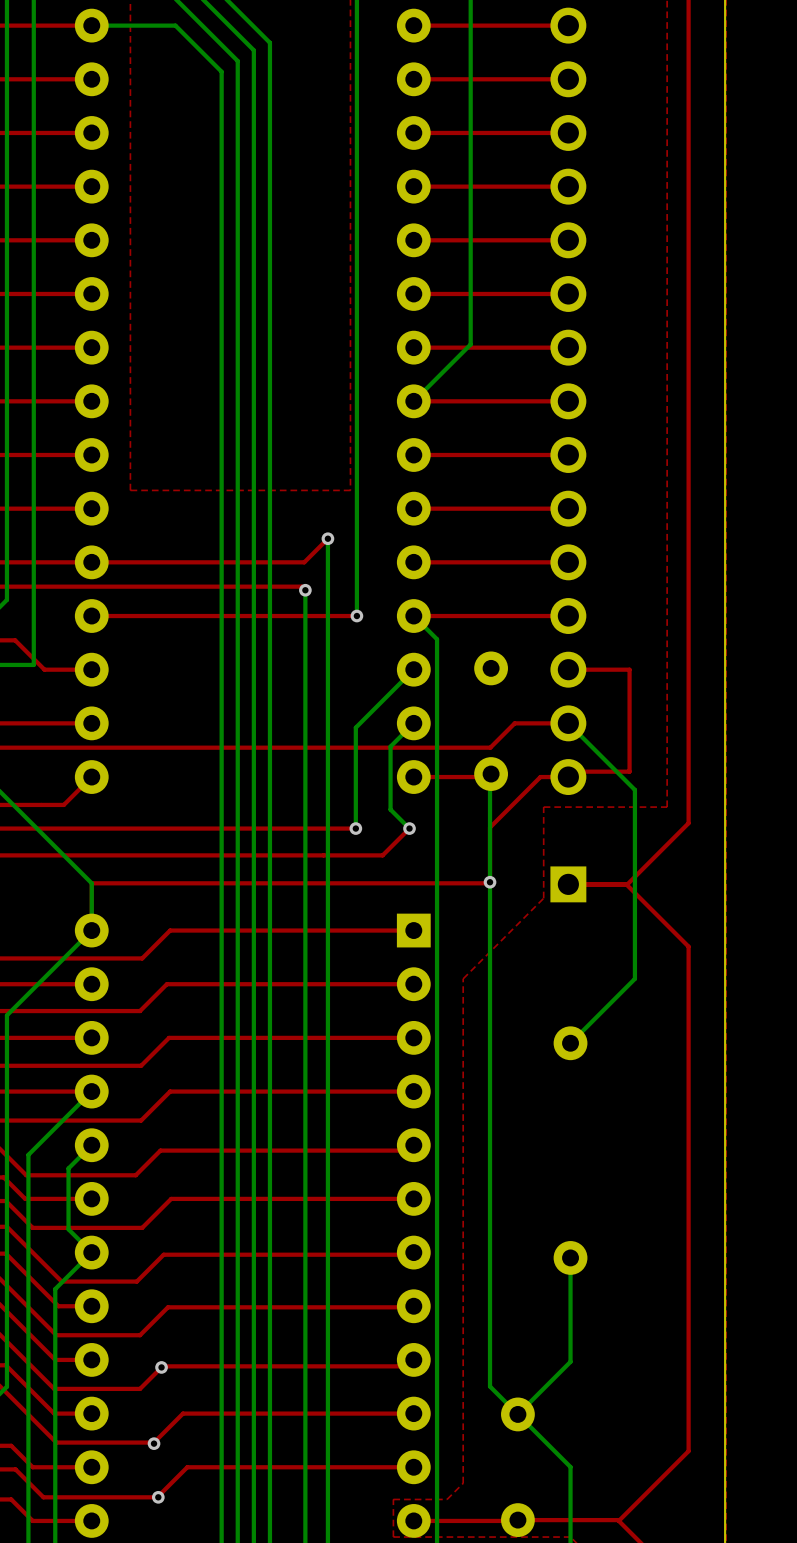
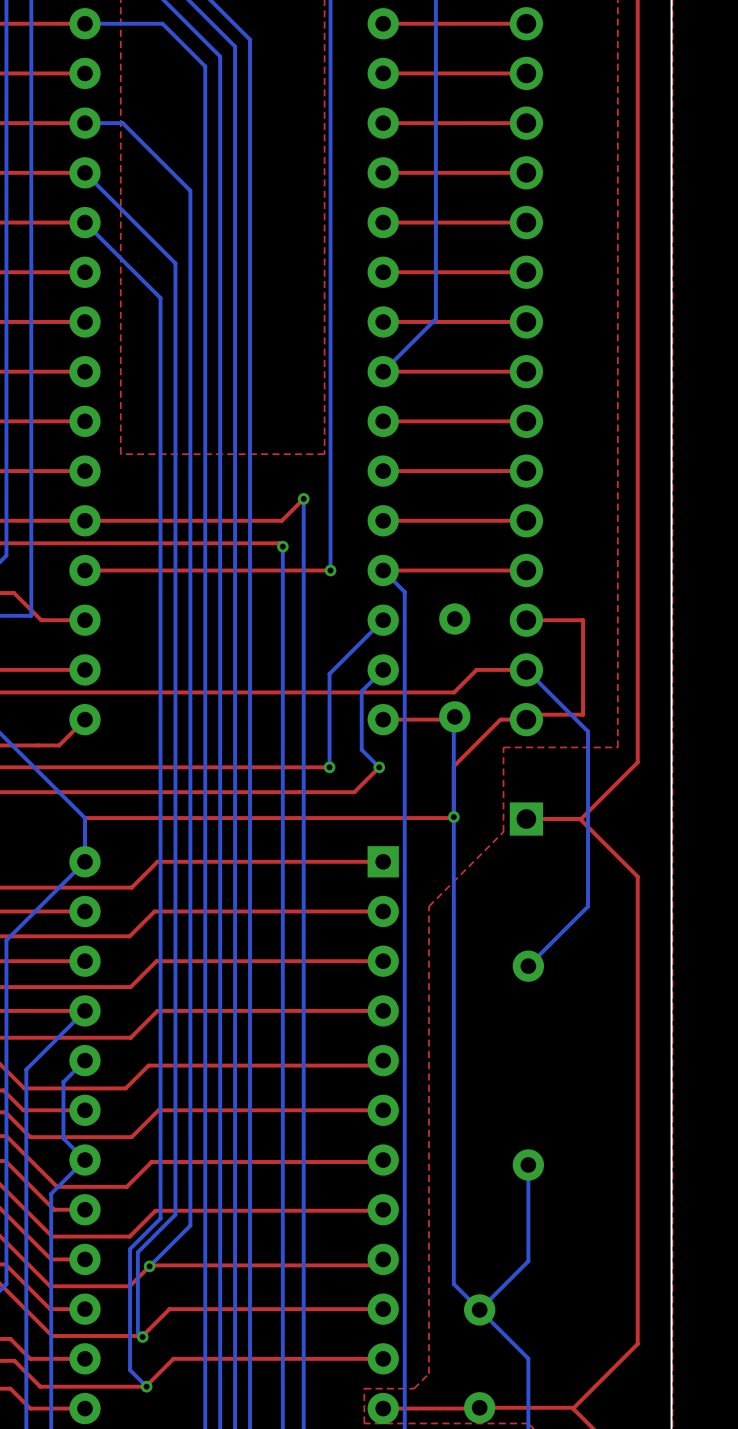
bottom track: none -> (84, 123) (122, 123) (190, 190) (190, 1225) (149, 1266)
bottom track: none -> (84, 172) (175, 263) (175, 1214) (137, 1252) (137, 1332) (142, 1336)
bottom track: none -> (84, 222) (160, 298) (160, 1218) (130, 1249) (130, 1370) (146, 1386)

